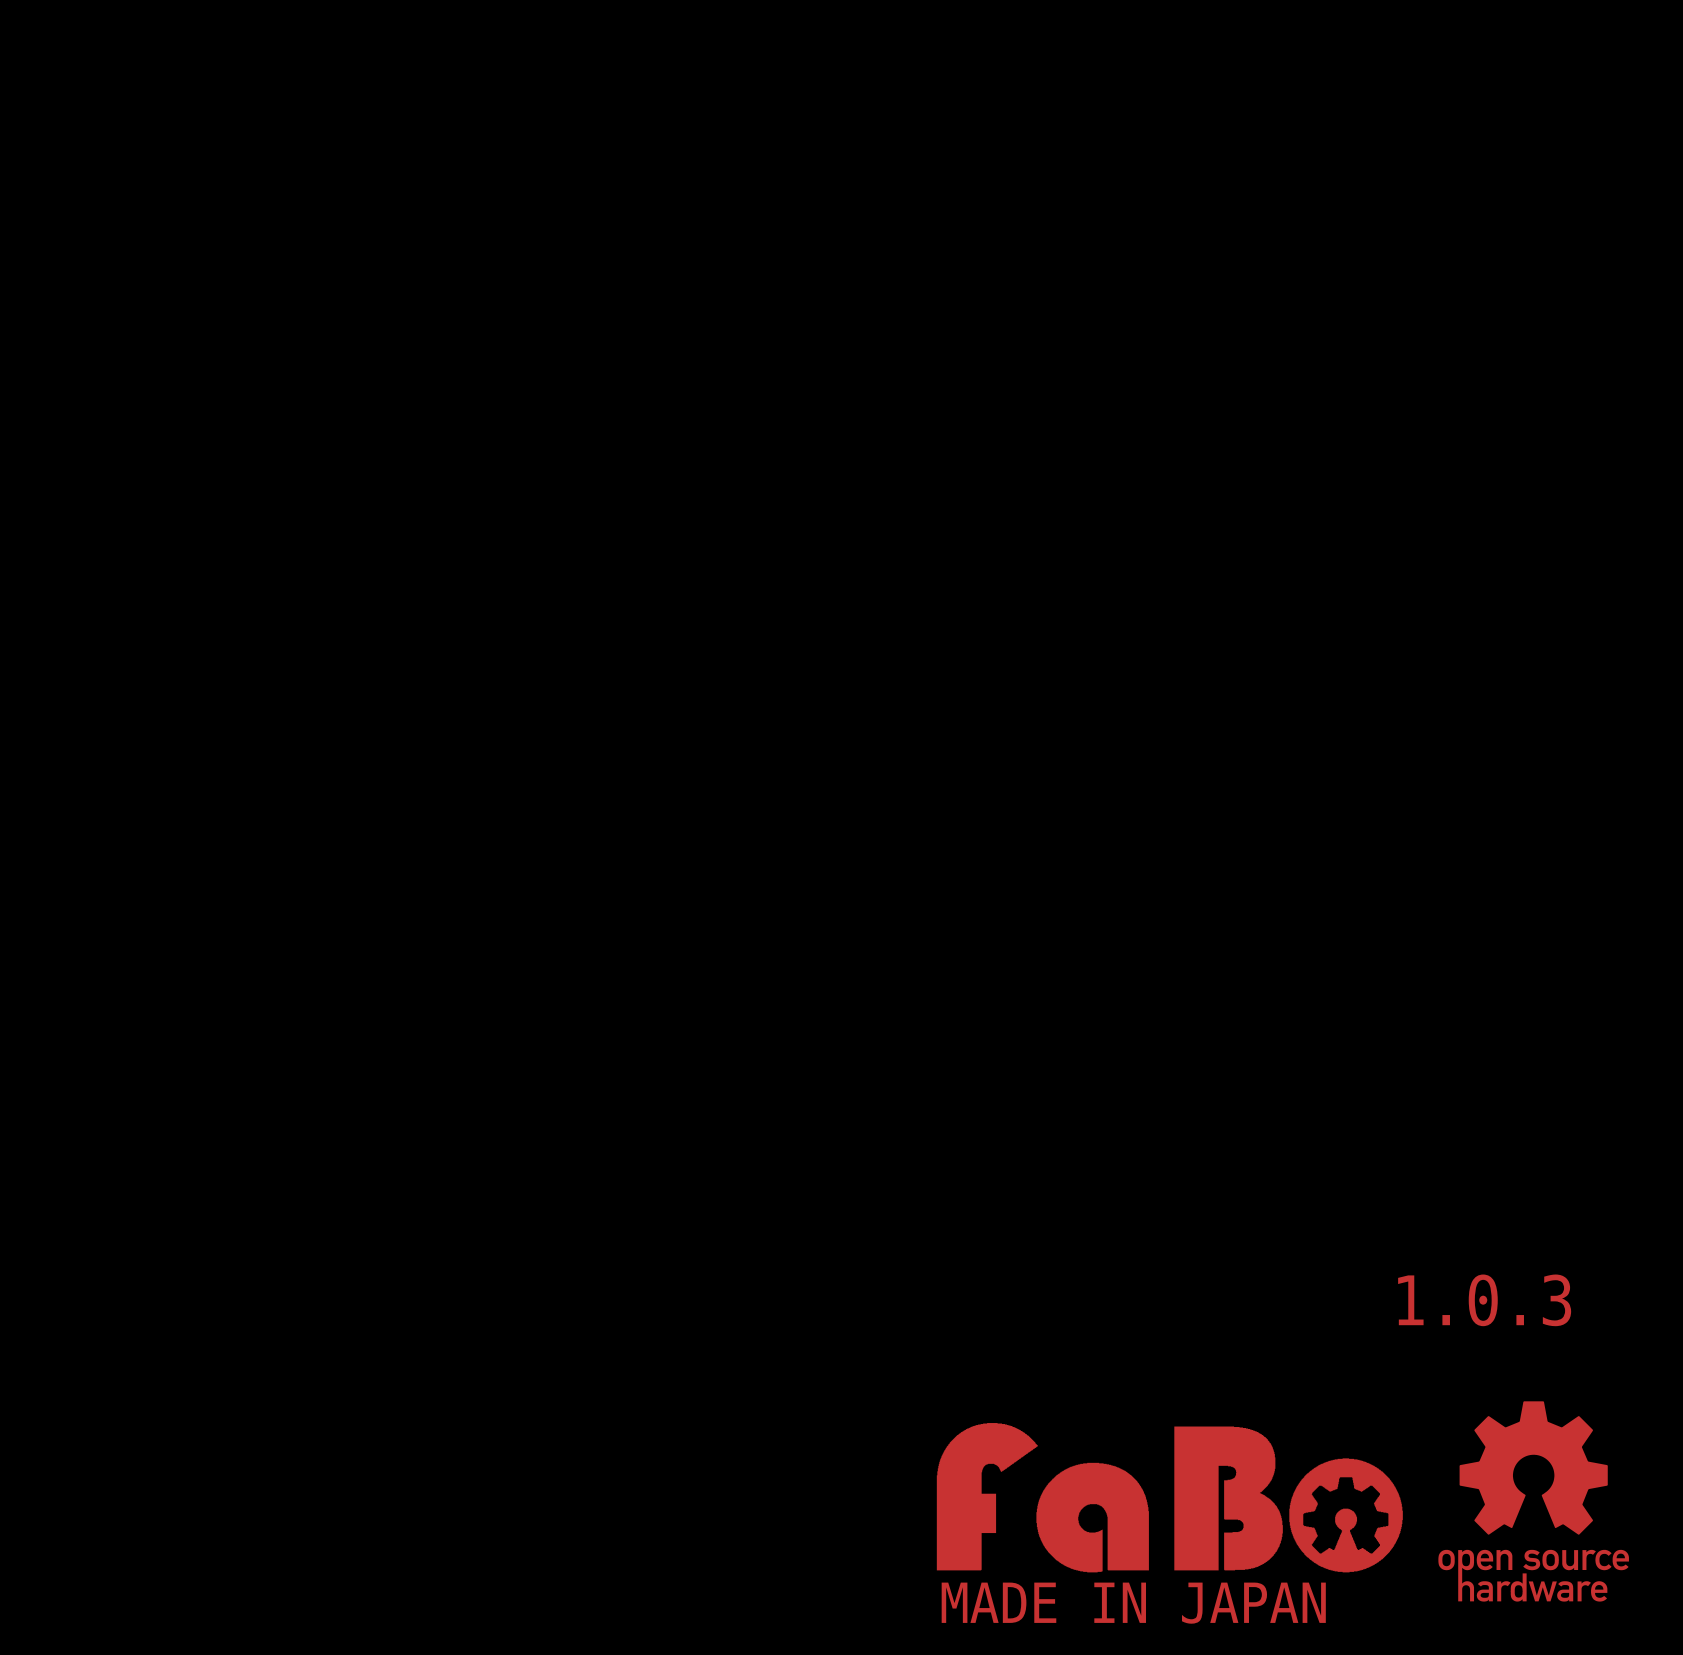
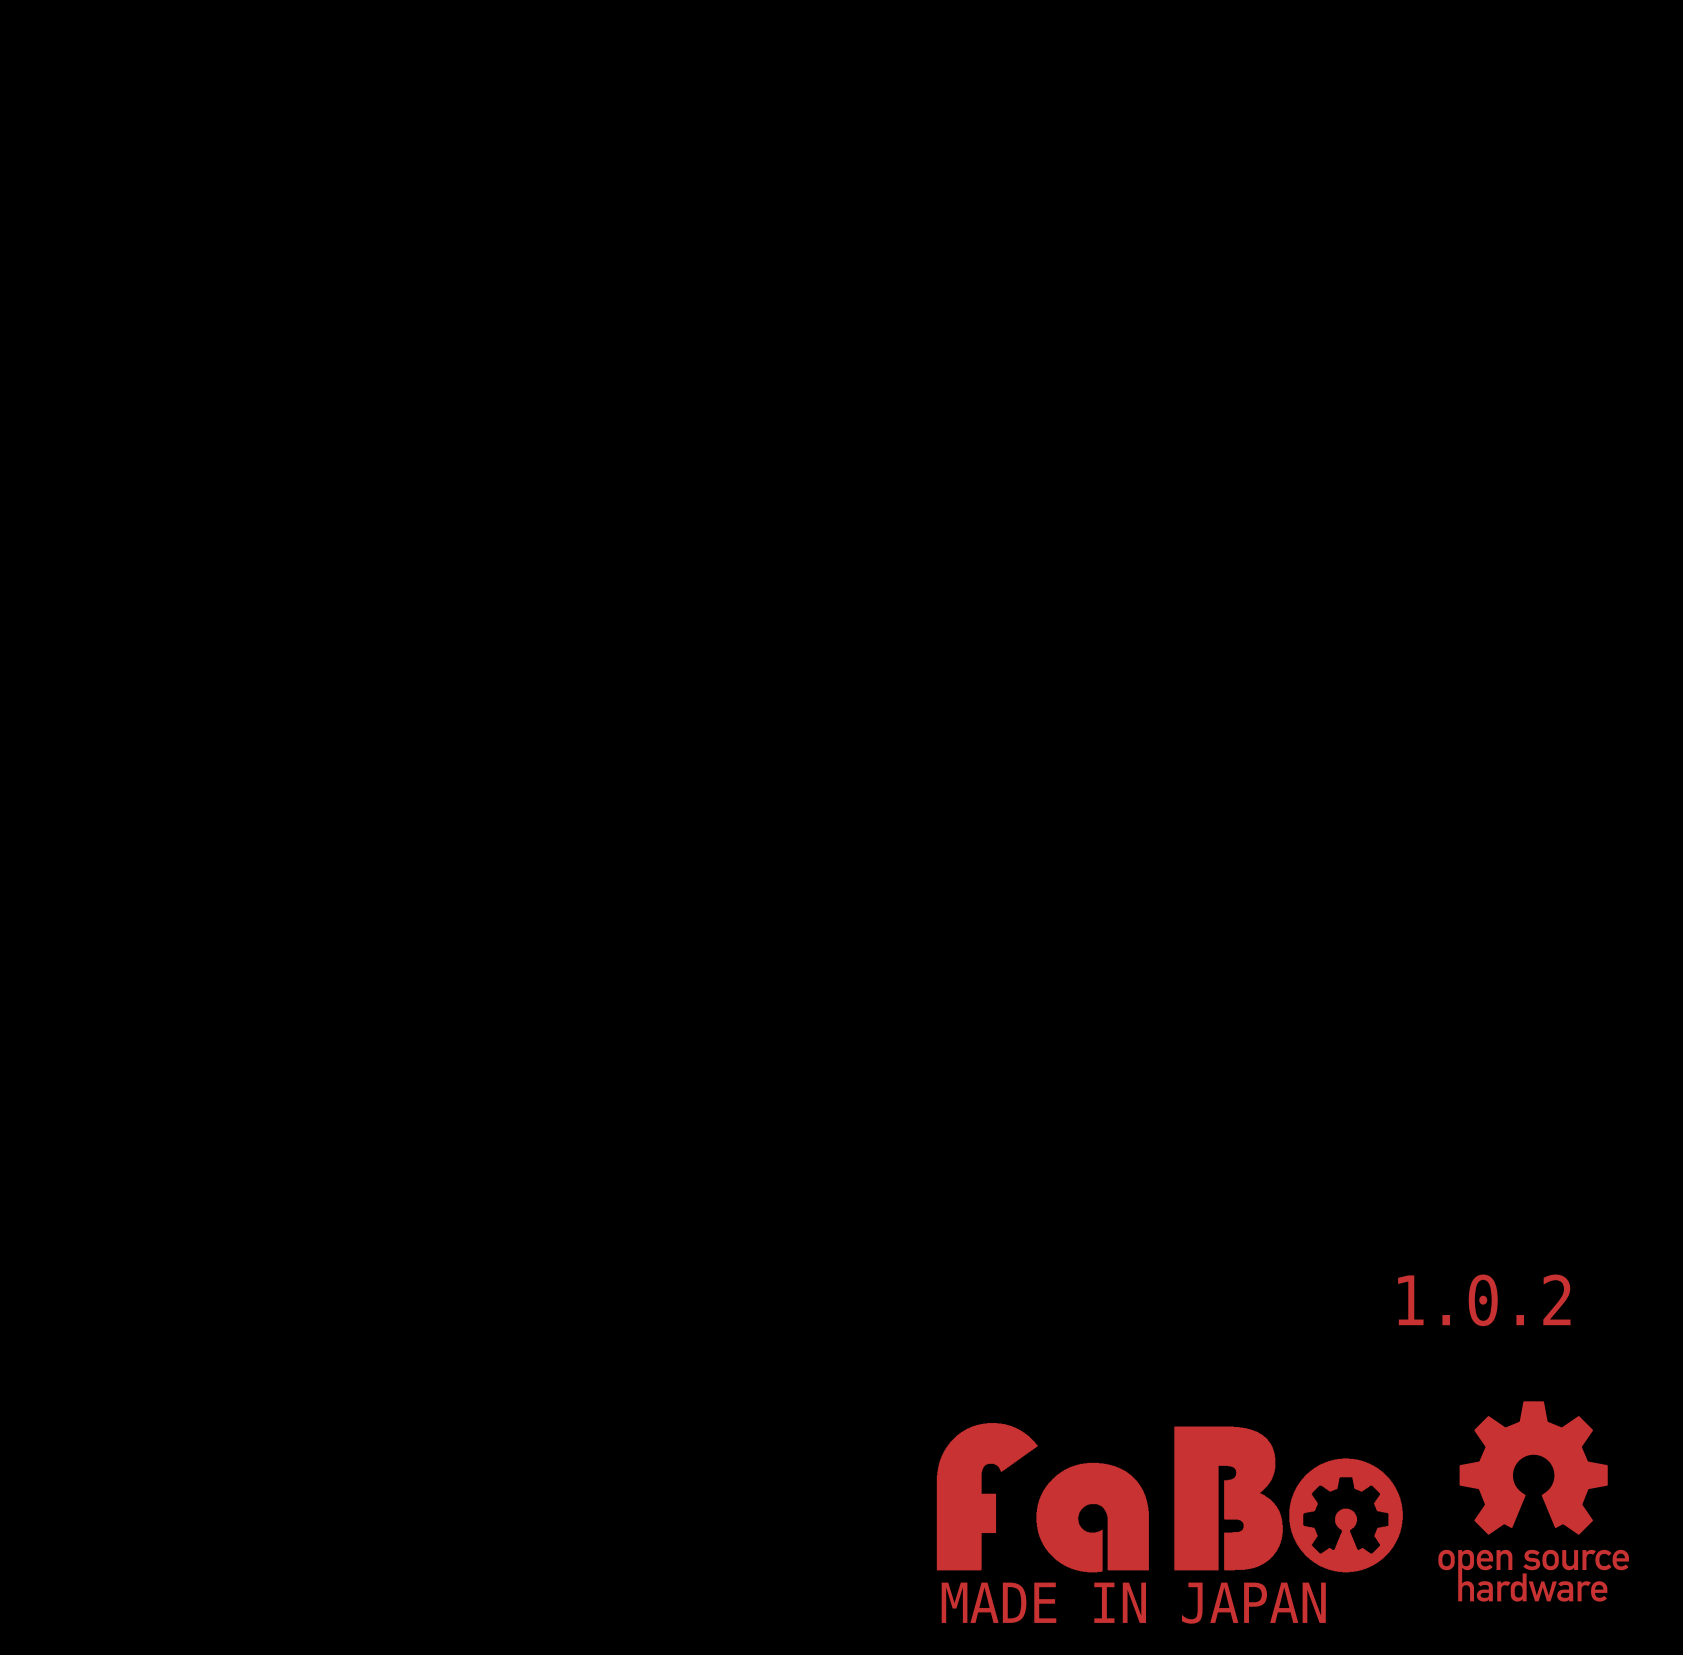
text: 1.0.3 (1484, 1300) -> 1.0.2 (1484, 1300)

